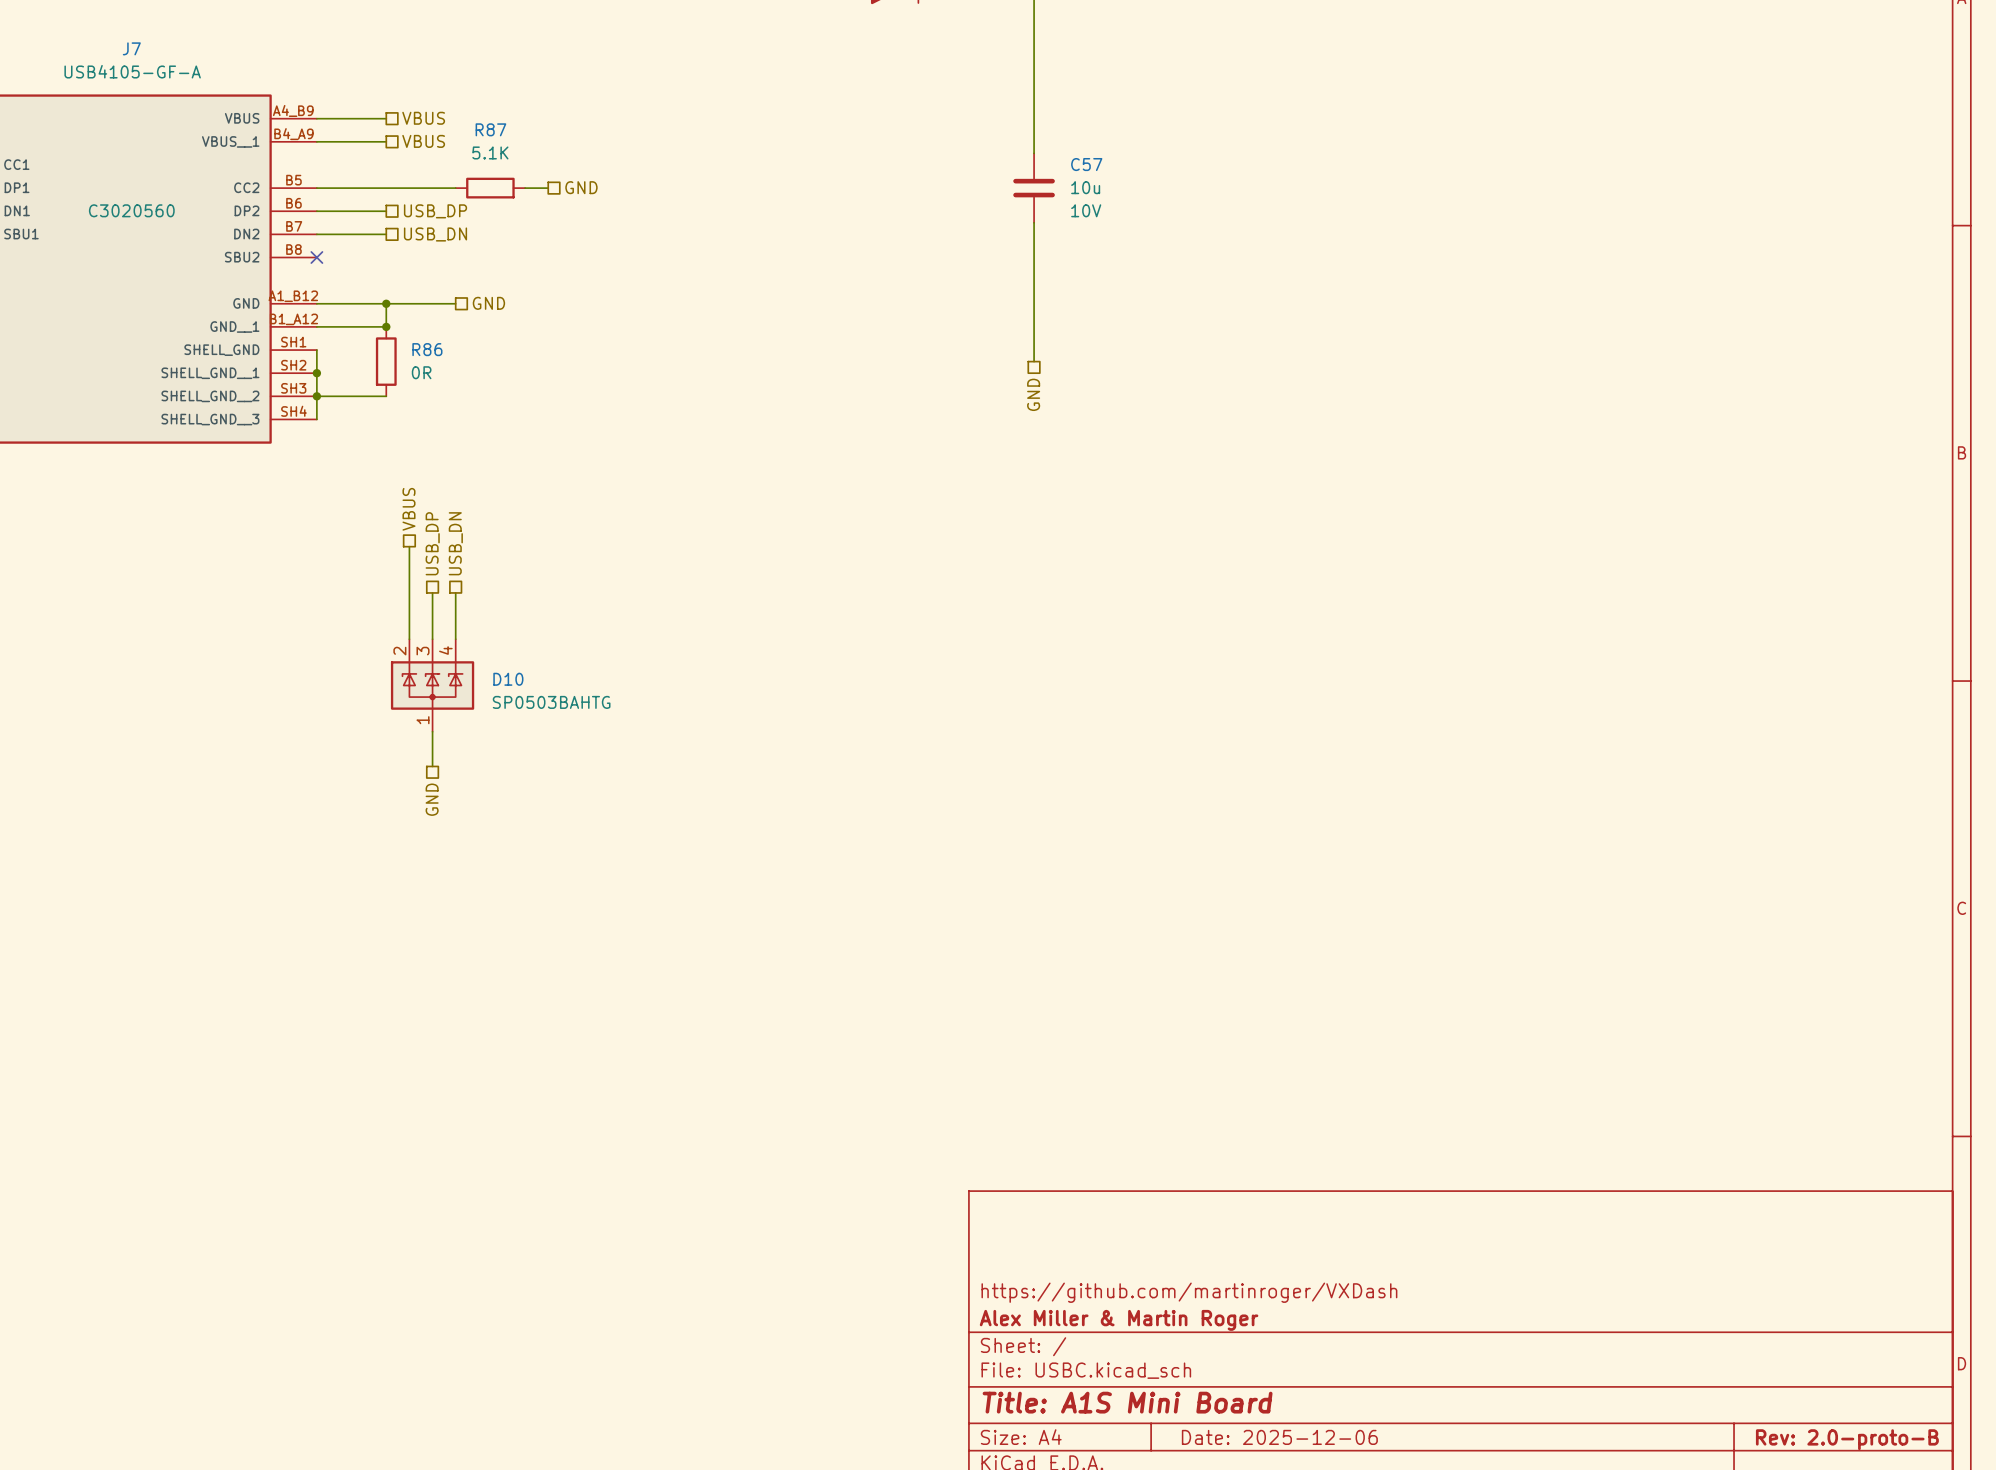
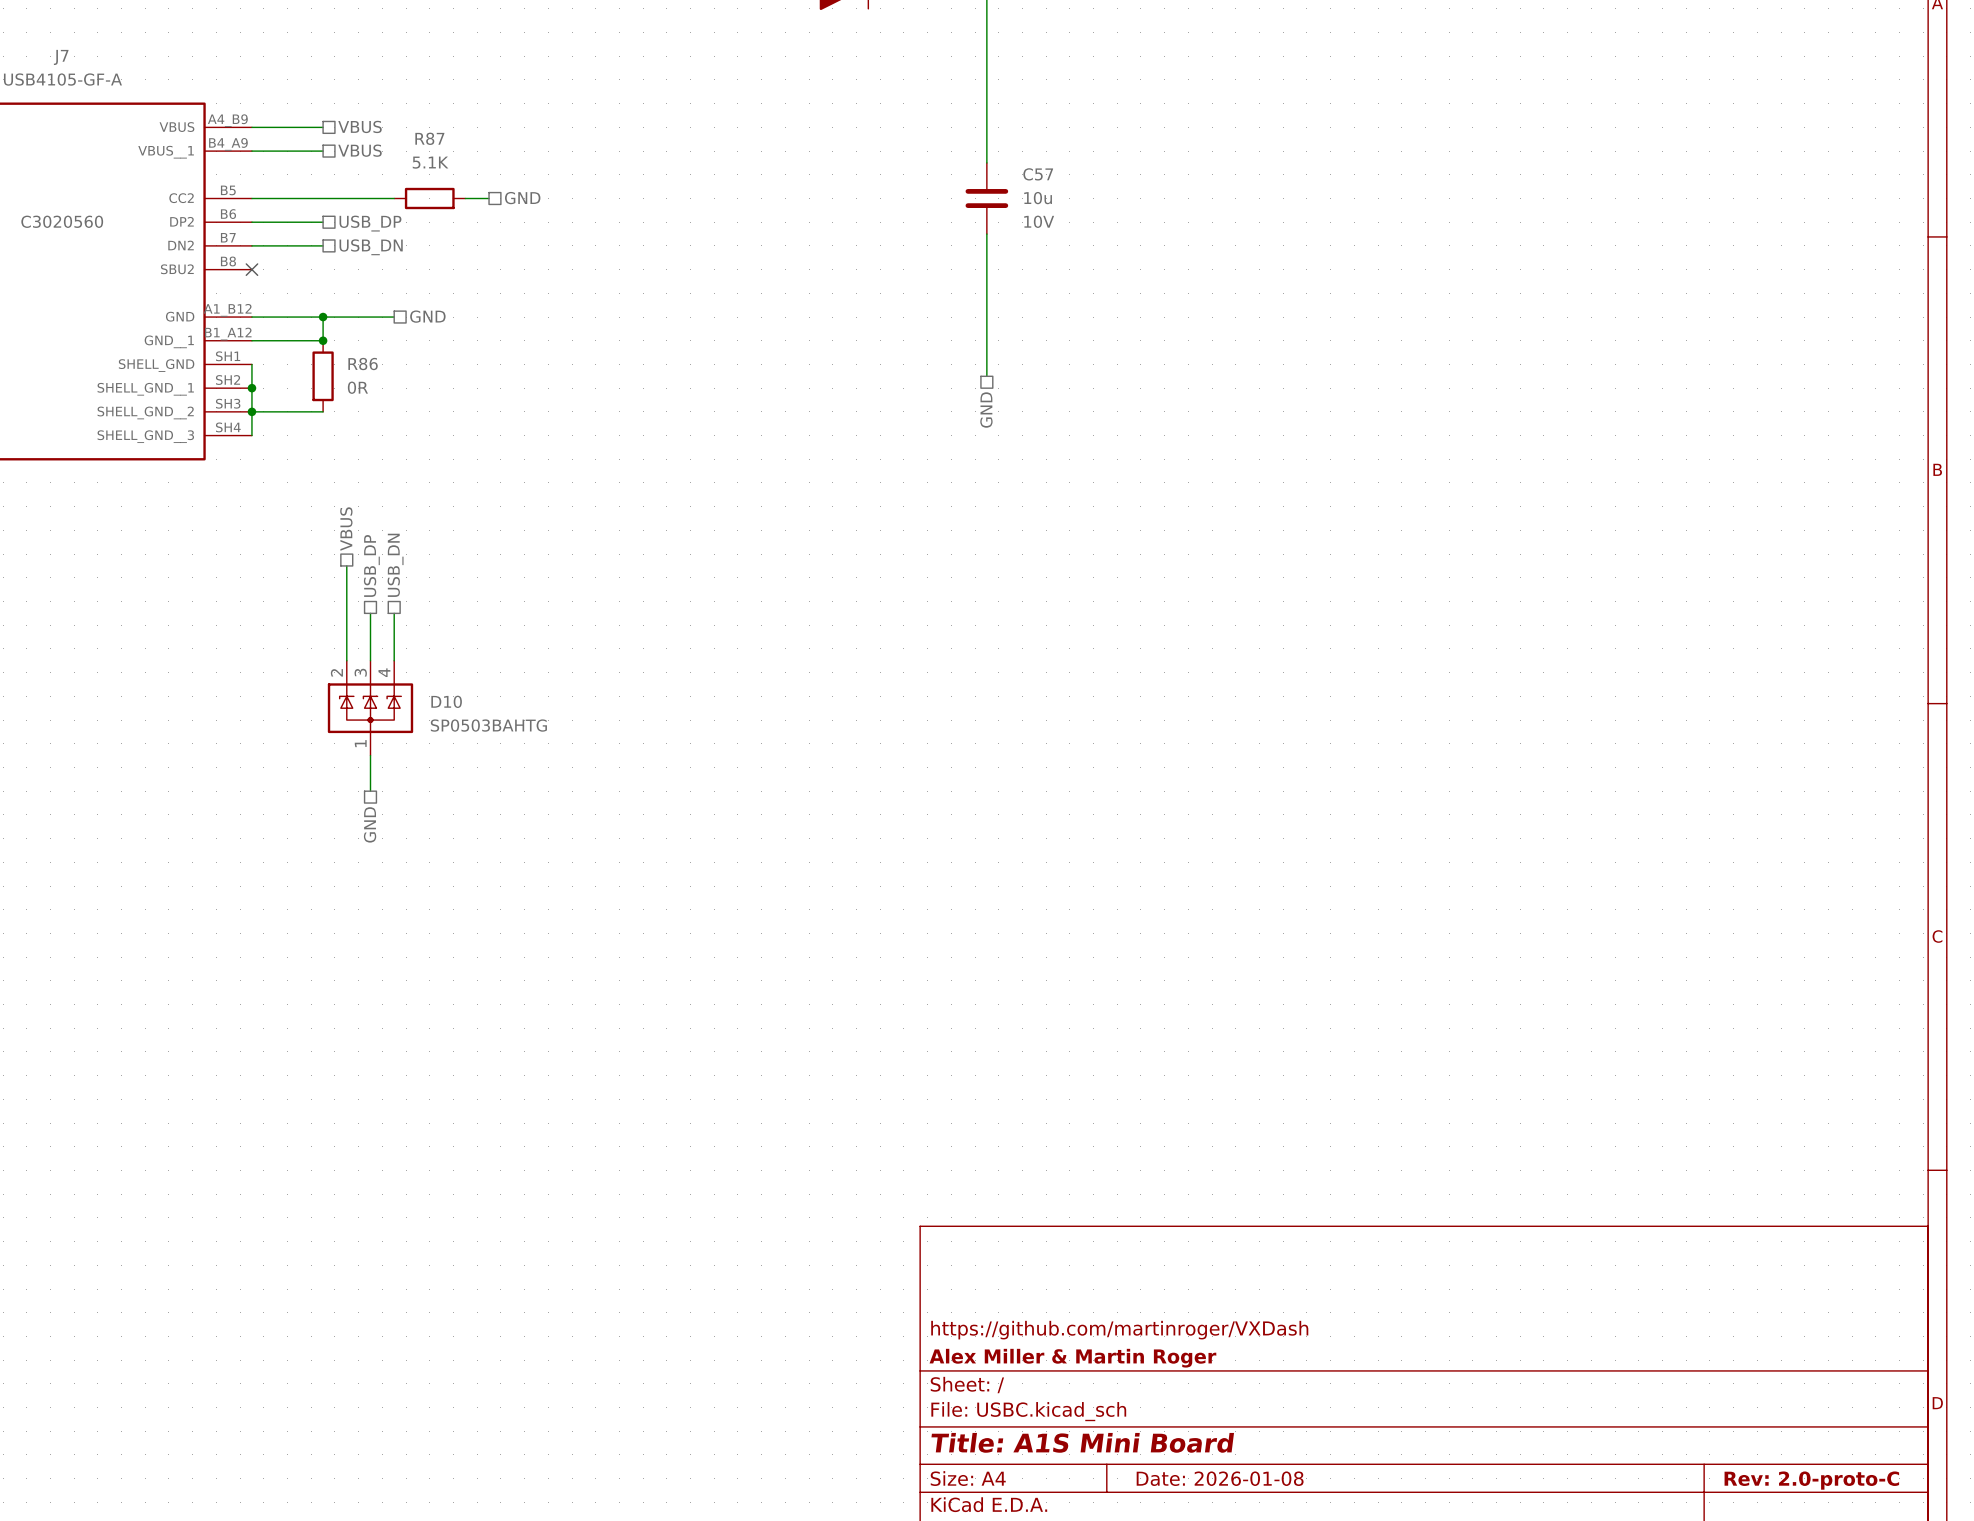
title block: Date: 2025-12-06 (1279, 1437) -> Date: 2026-01-08 (1220, 1478)
title block: Rev: 2.0-proto-B (1847, 1439) -> Rev: 2.0-proto-C (1811, 1480)

